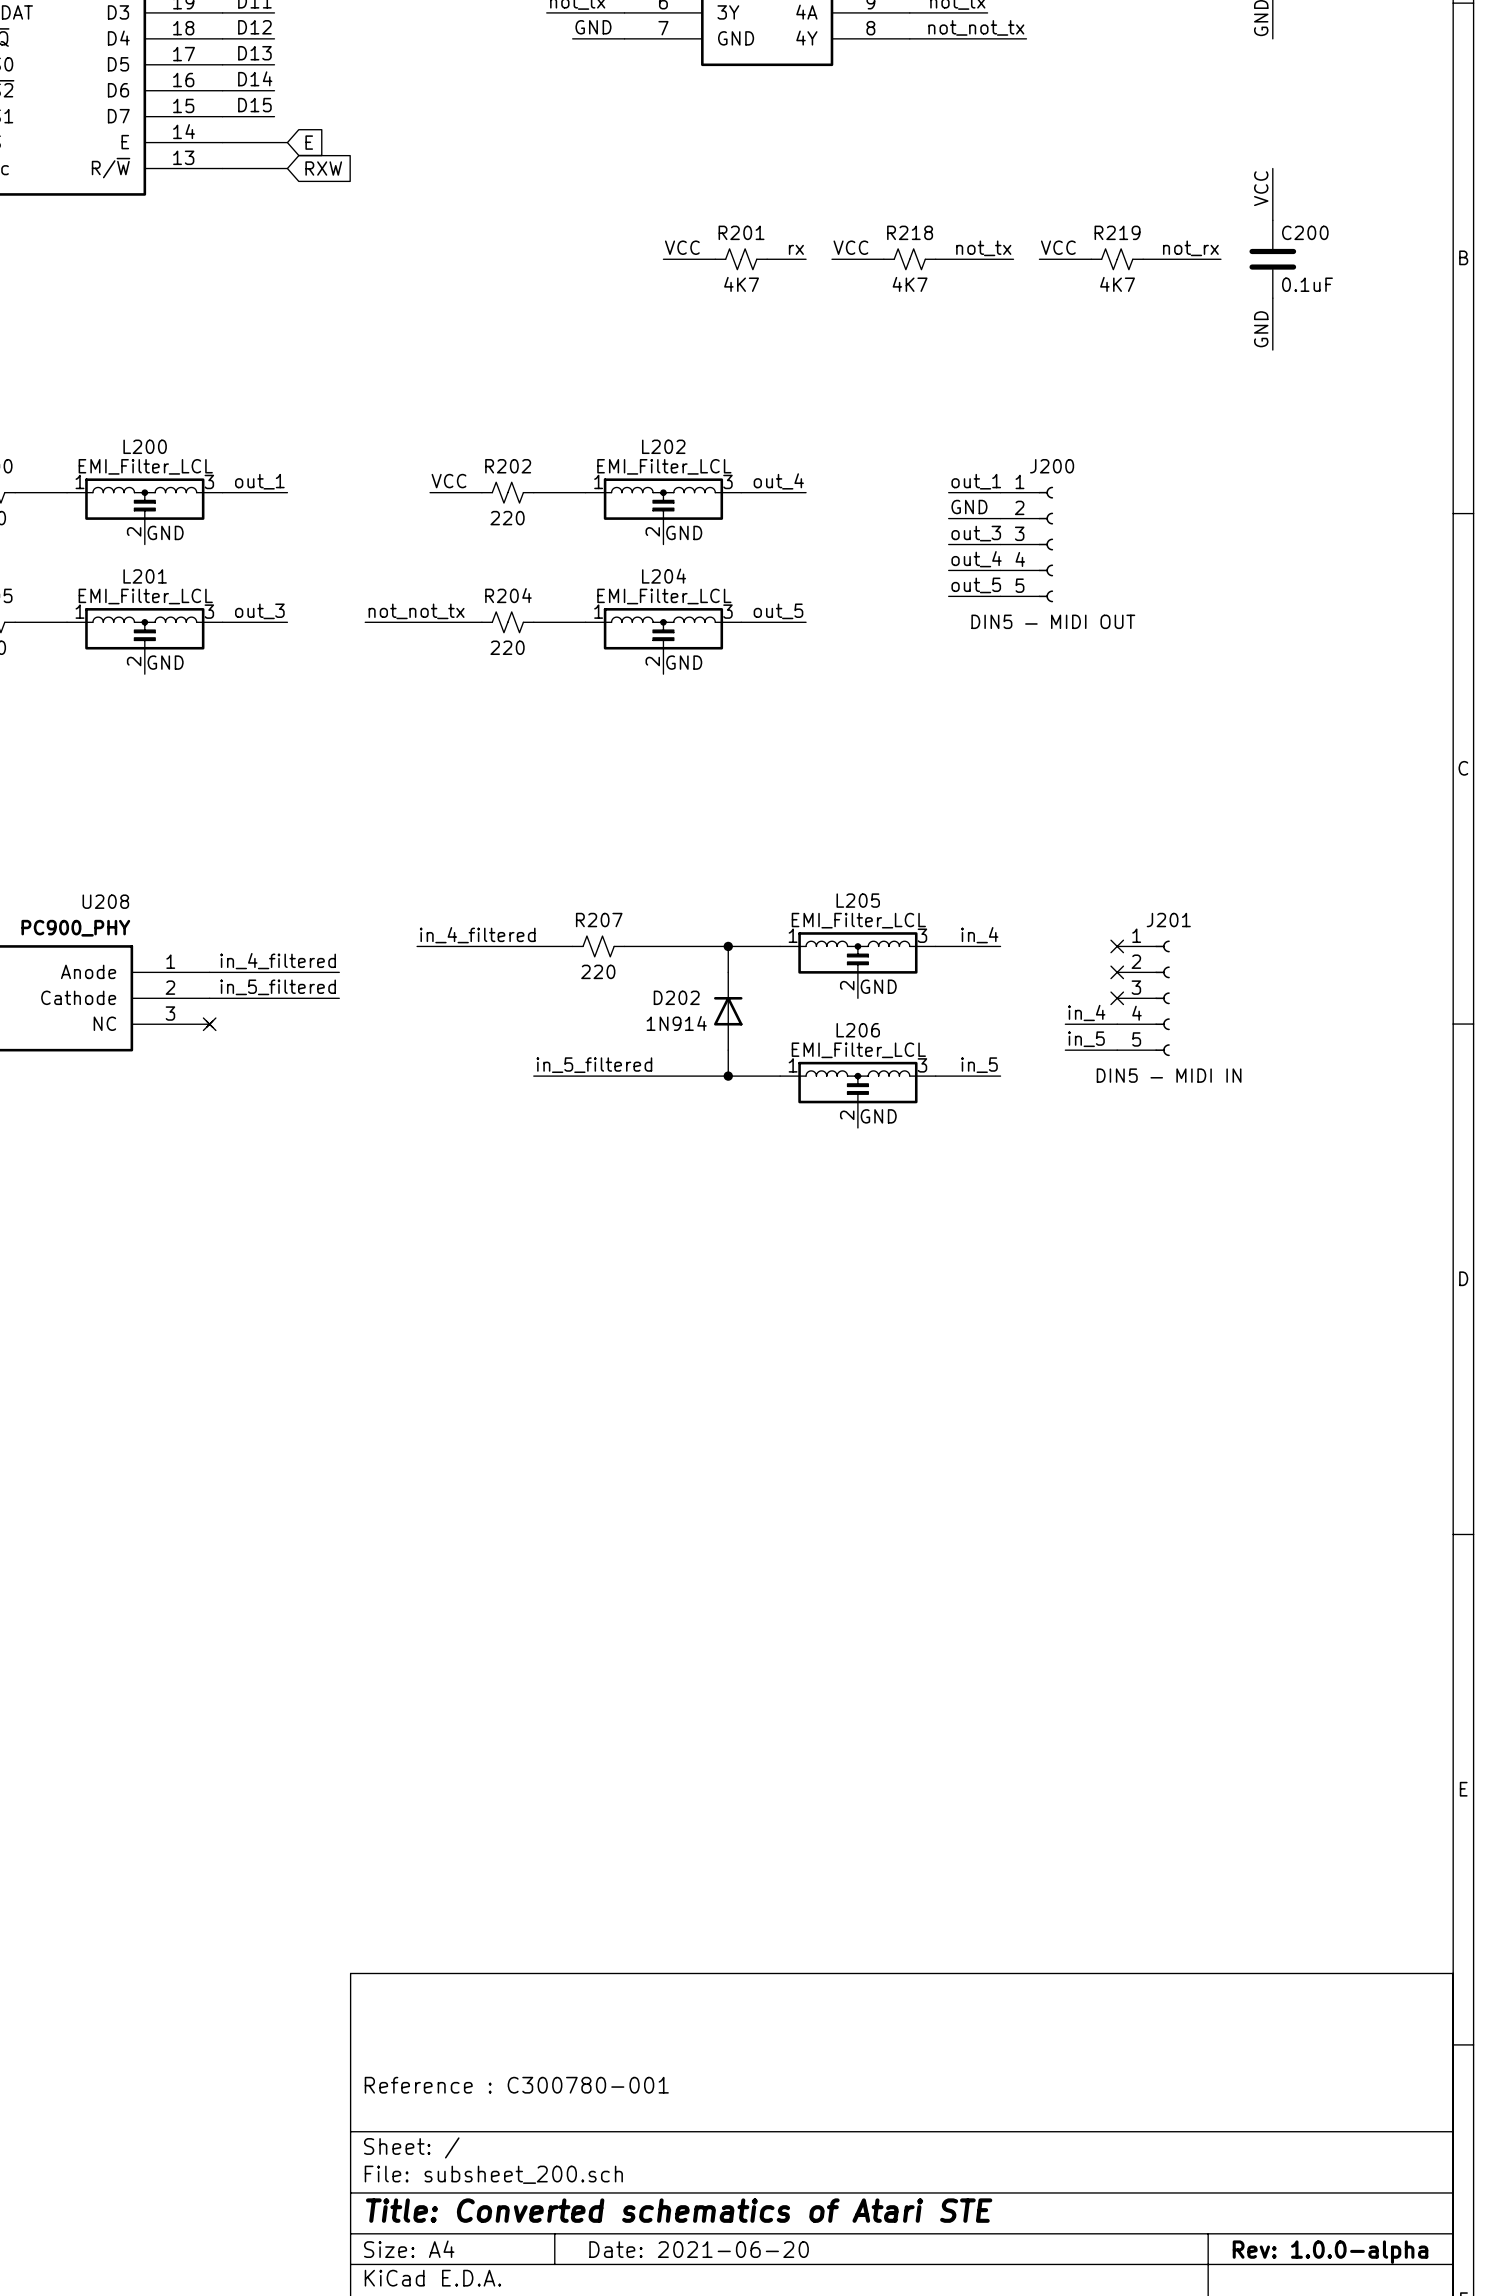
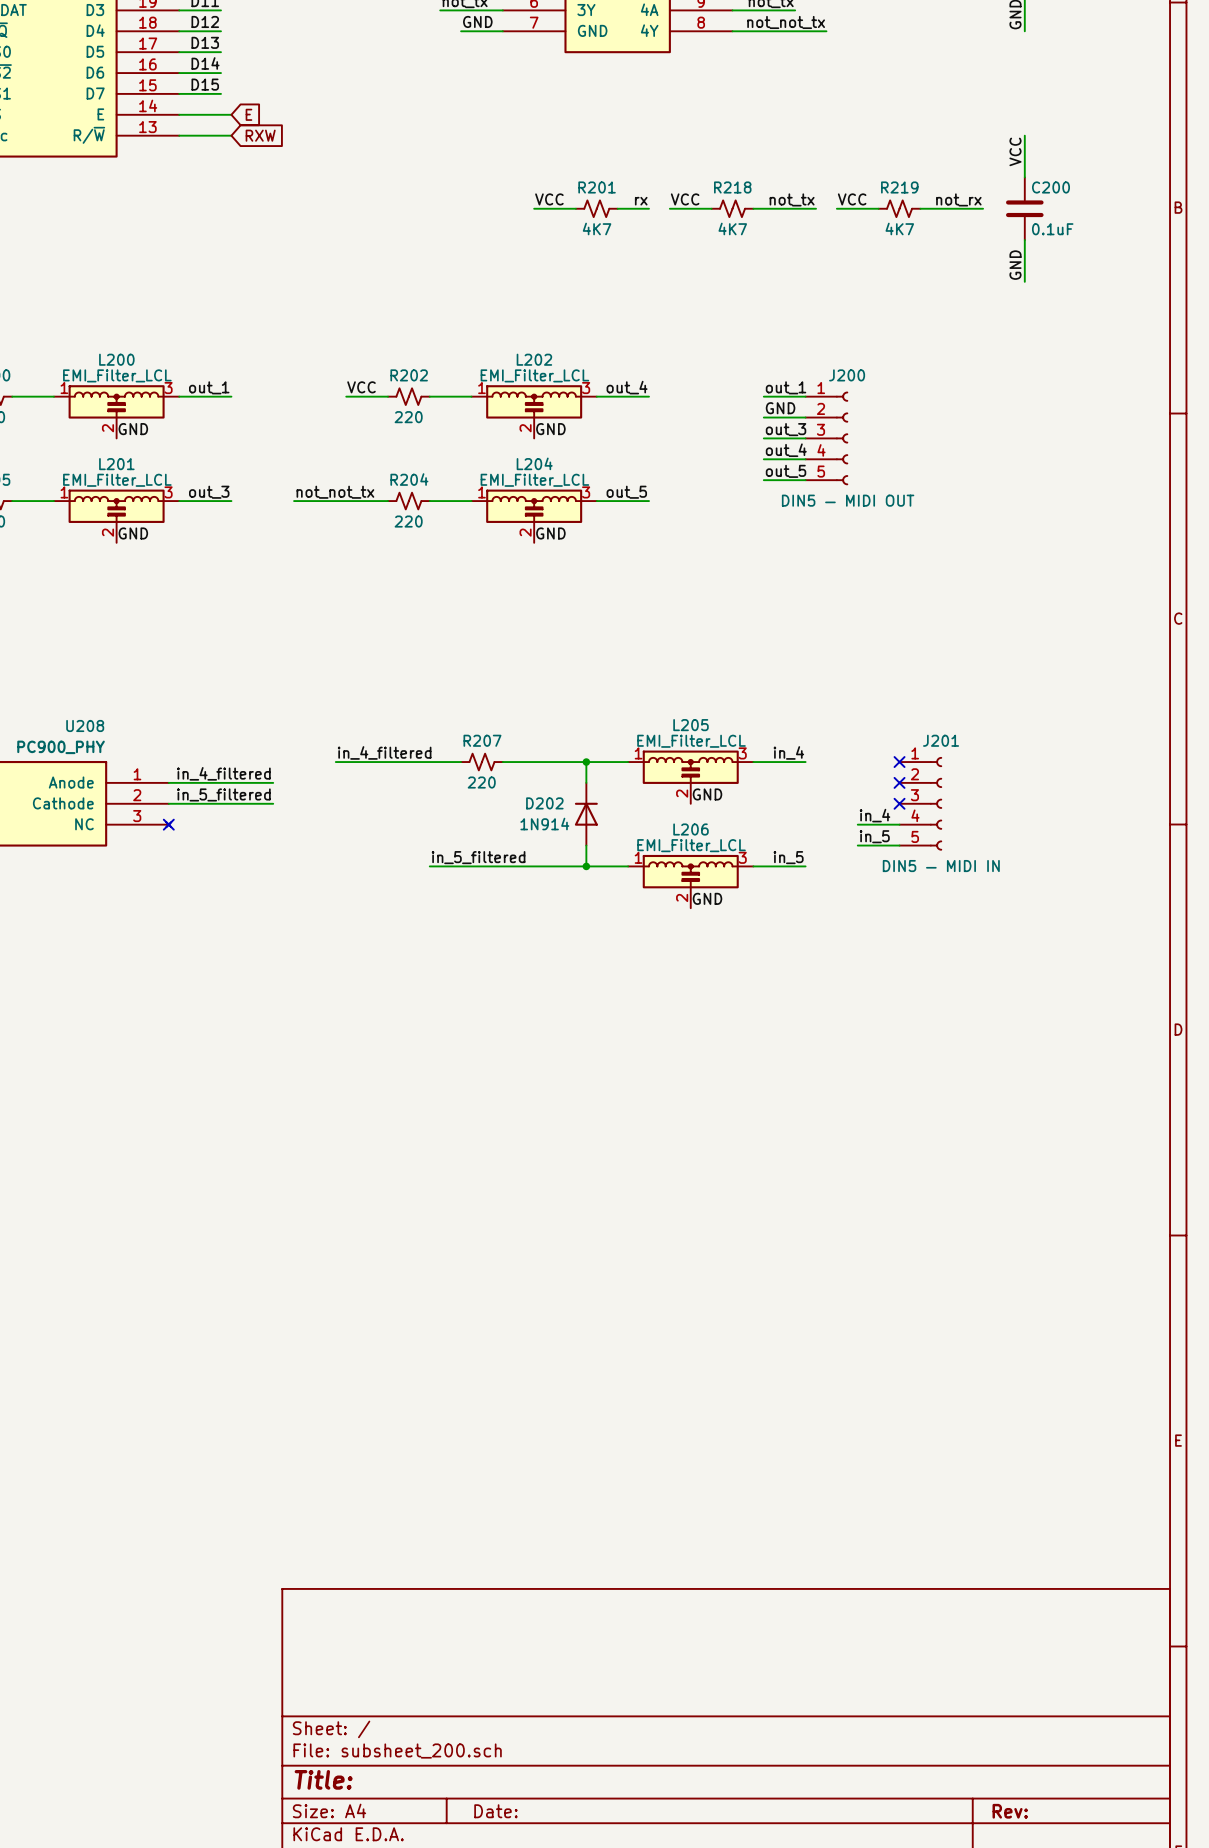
title block: Reference : C300780-001 (516, 2085) -> none
title block: Title: Converted schematics of Atari STE (679, 2210) -> Title: (323, 1779)
title block: Date: 2021-06-20 (699, 2249) -> Date: (495, 1811)
title block: Rev: 1.0.0-alpha (1330, 2252) -> Rev: (1010, 1811)

